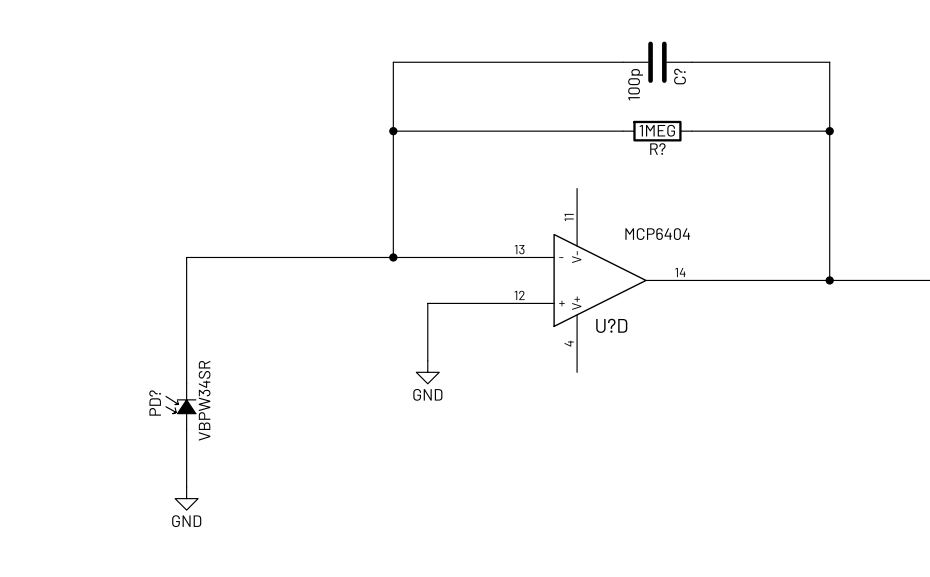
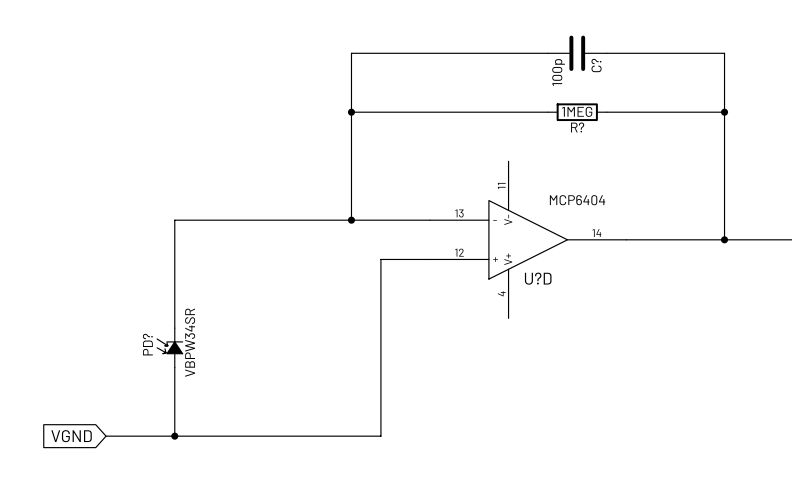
wire: none -> (380, 308) (380, 436) (106, 436)
power symbol: GND (427, 372) -> none
power symbol: GND (186, 498) -> none
global label: none -> VGND (71, 436)
junction: none -> (174, 436)

